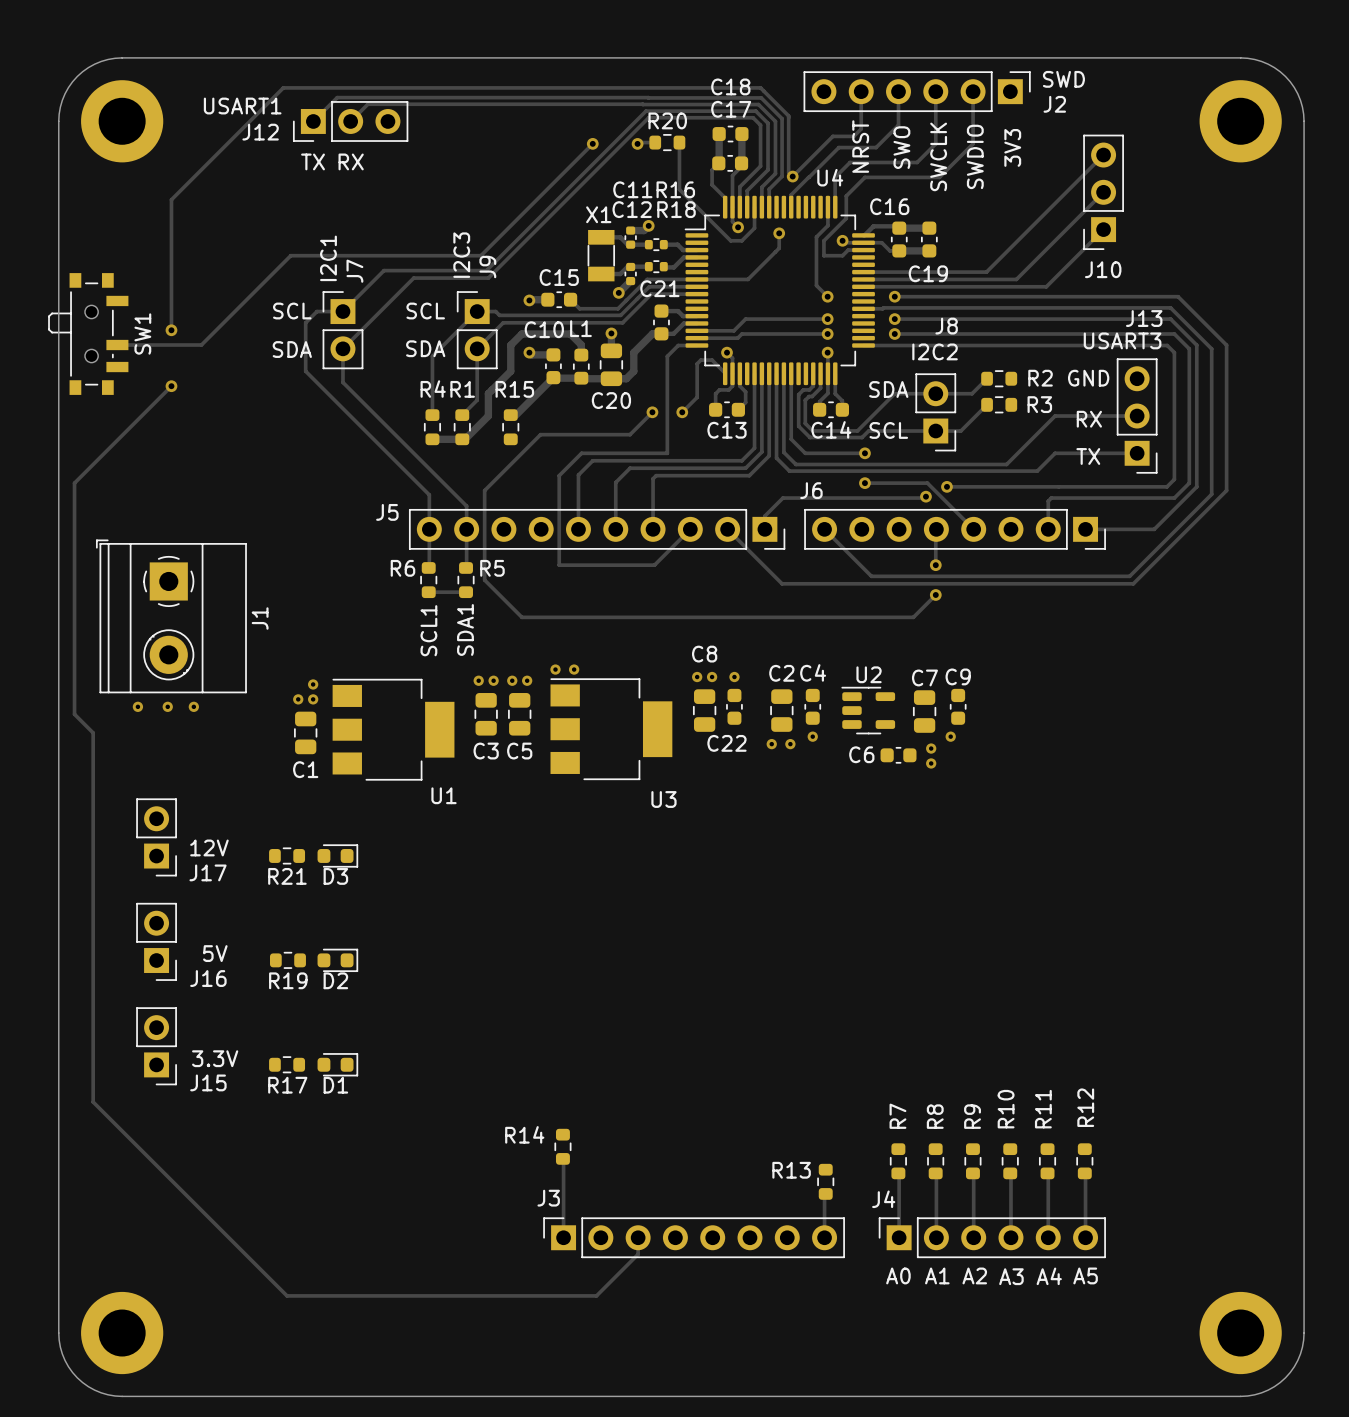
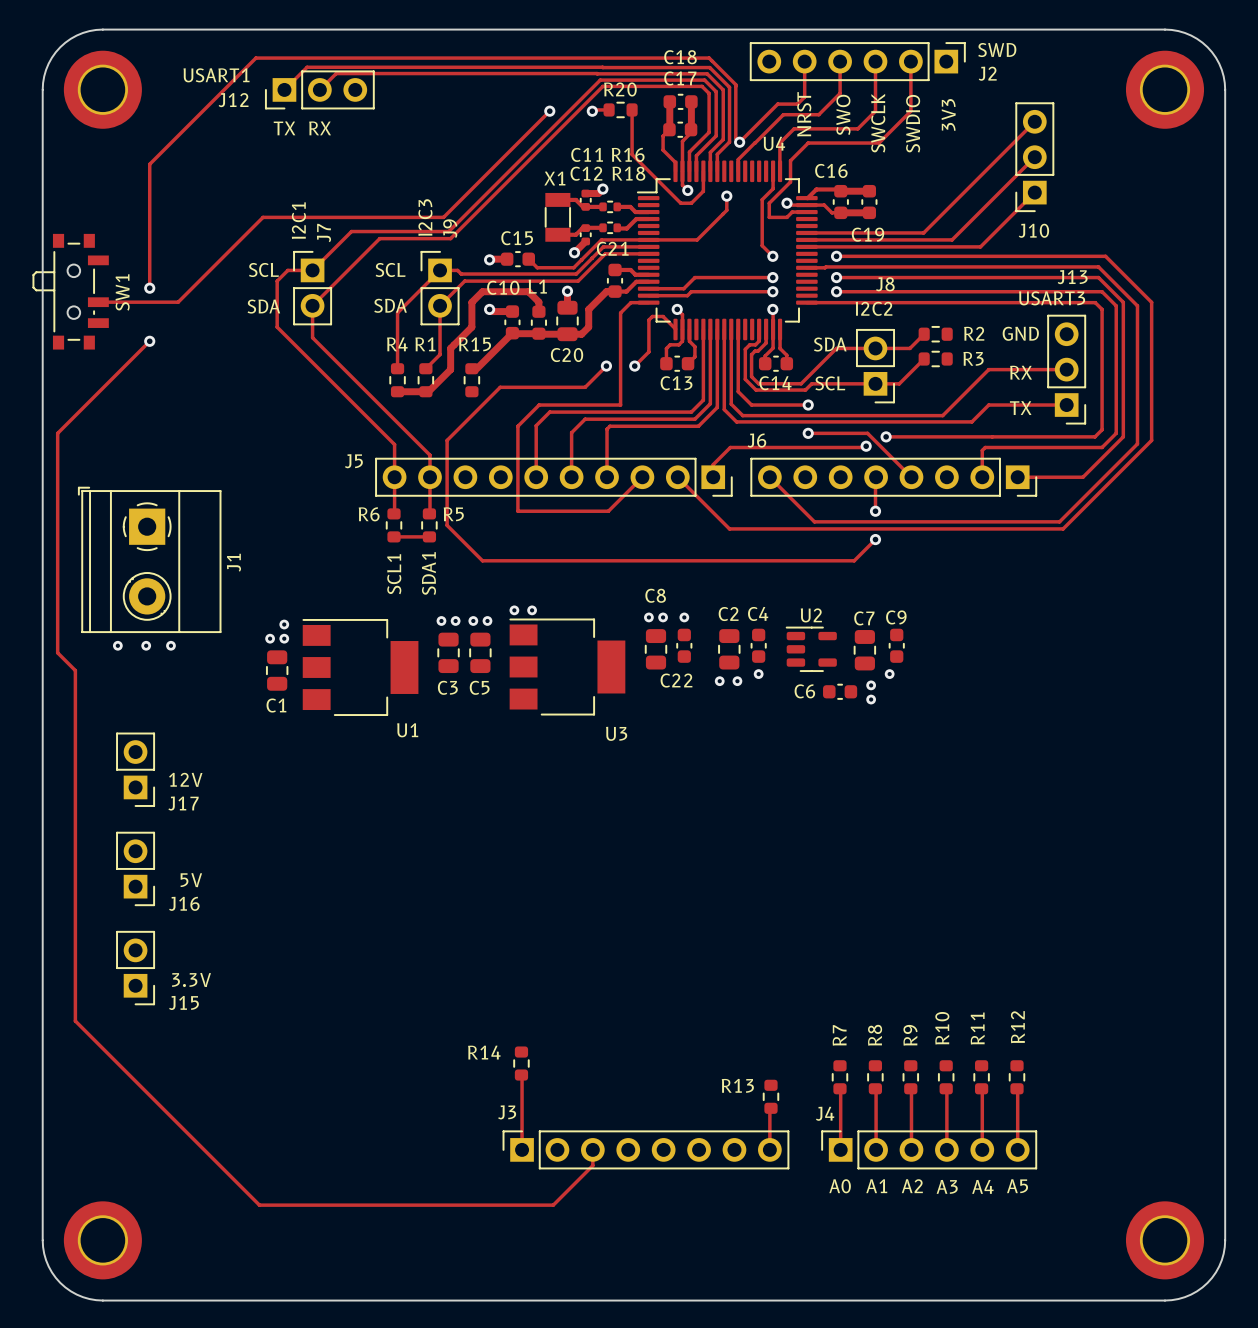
R21: (287, 855) -> none
D3: (337, 855) -> none
R19: (287, 960) -> none
D2: (337, 960) -> none
R17: (287, 1064) -> none
D1: (337, 1064) -> none

